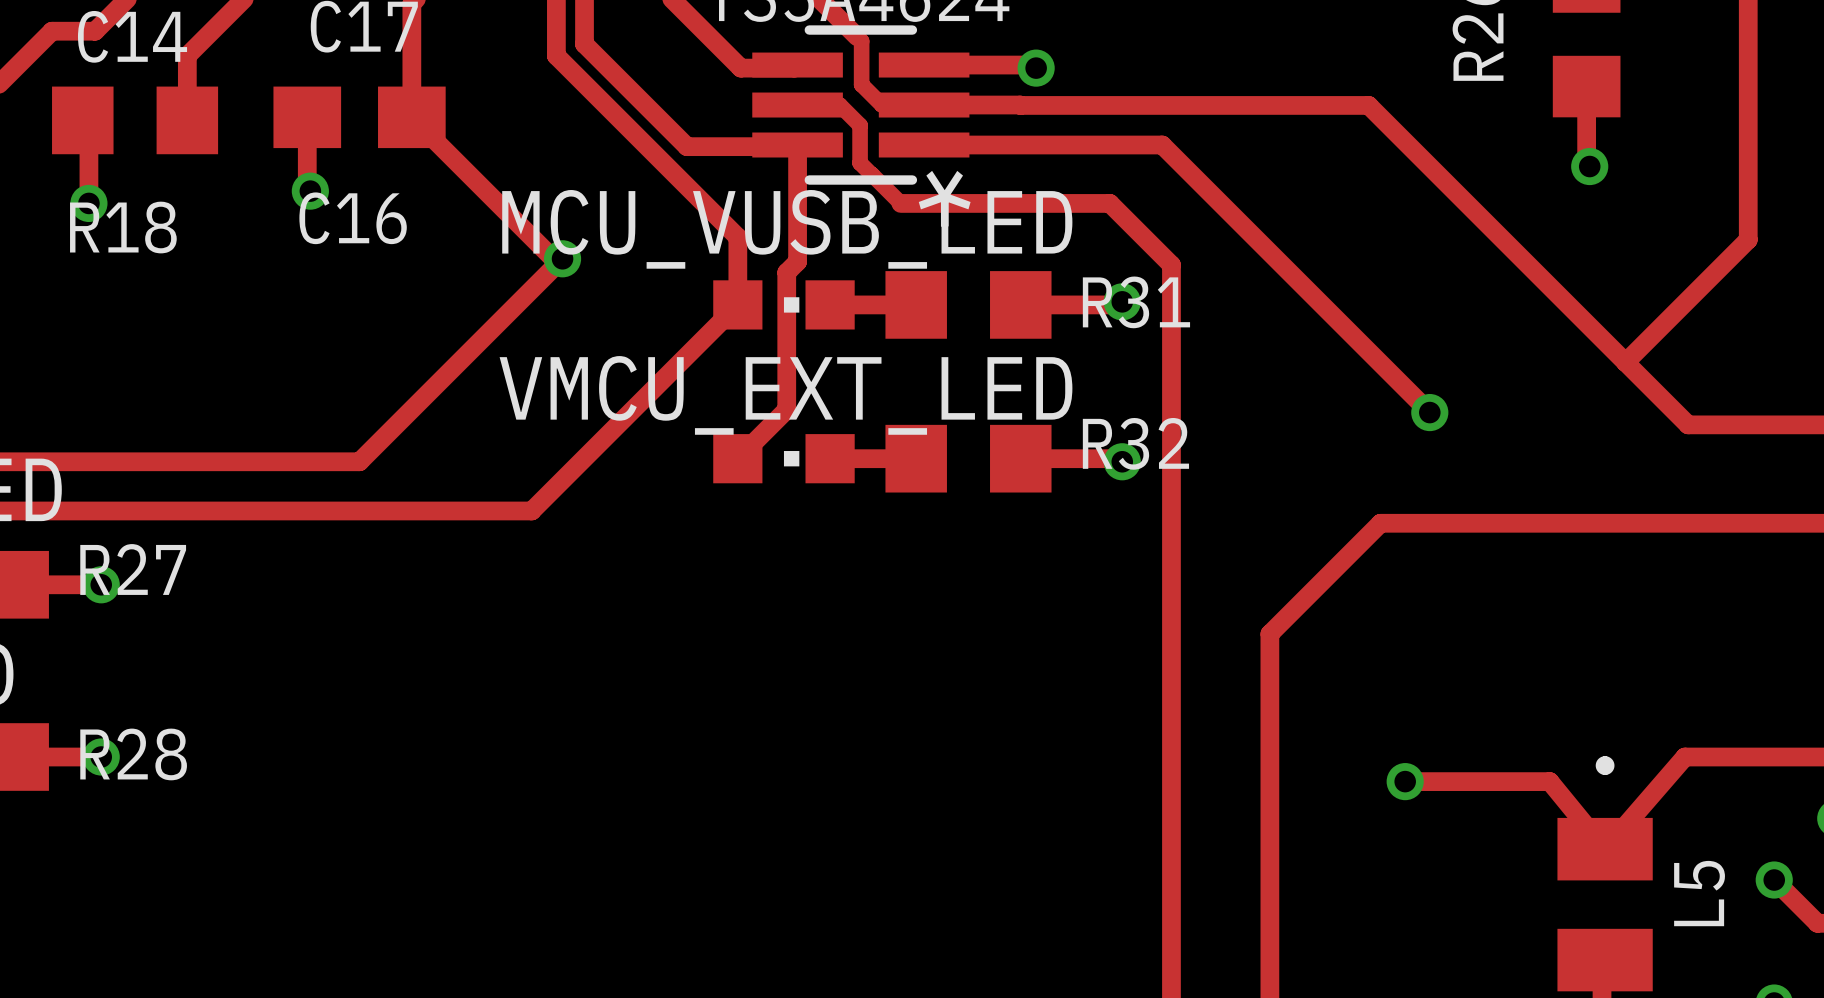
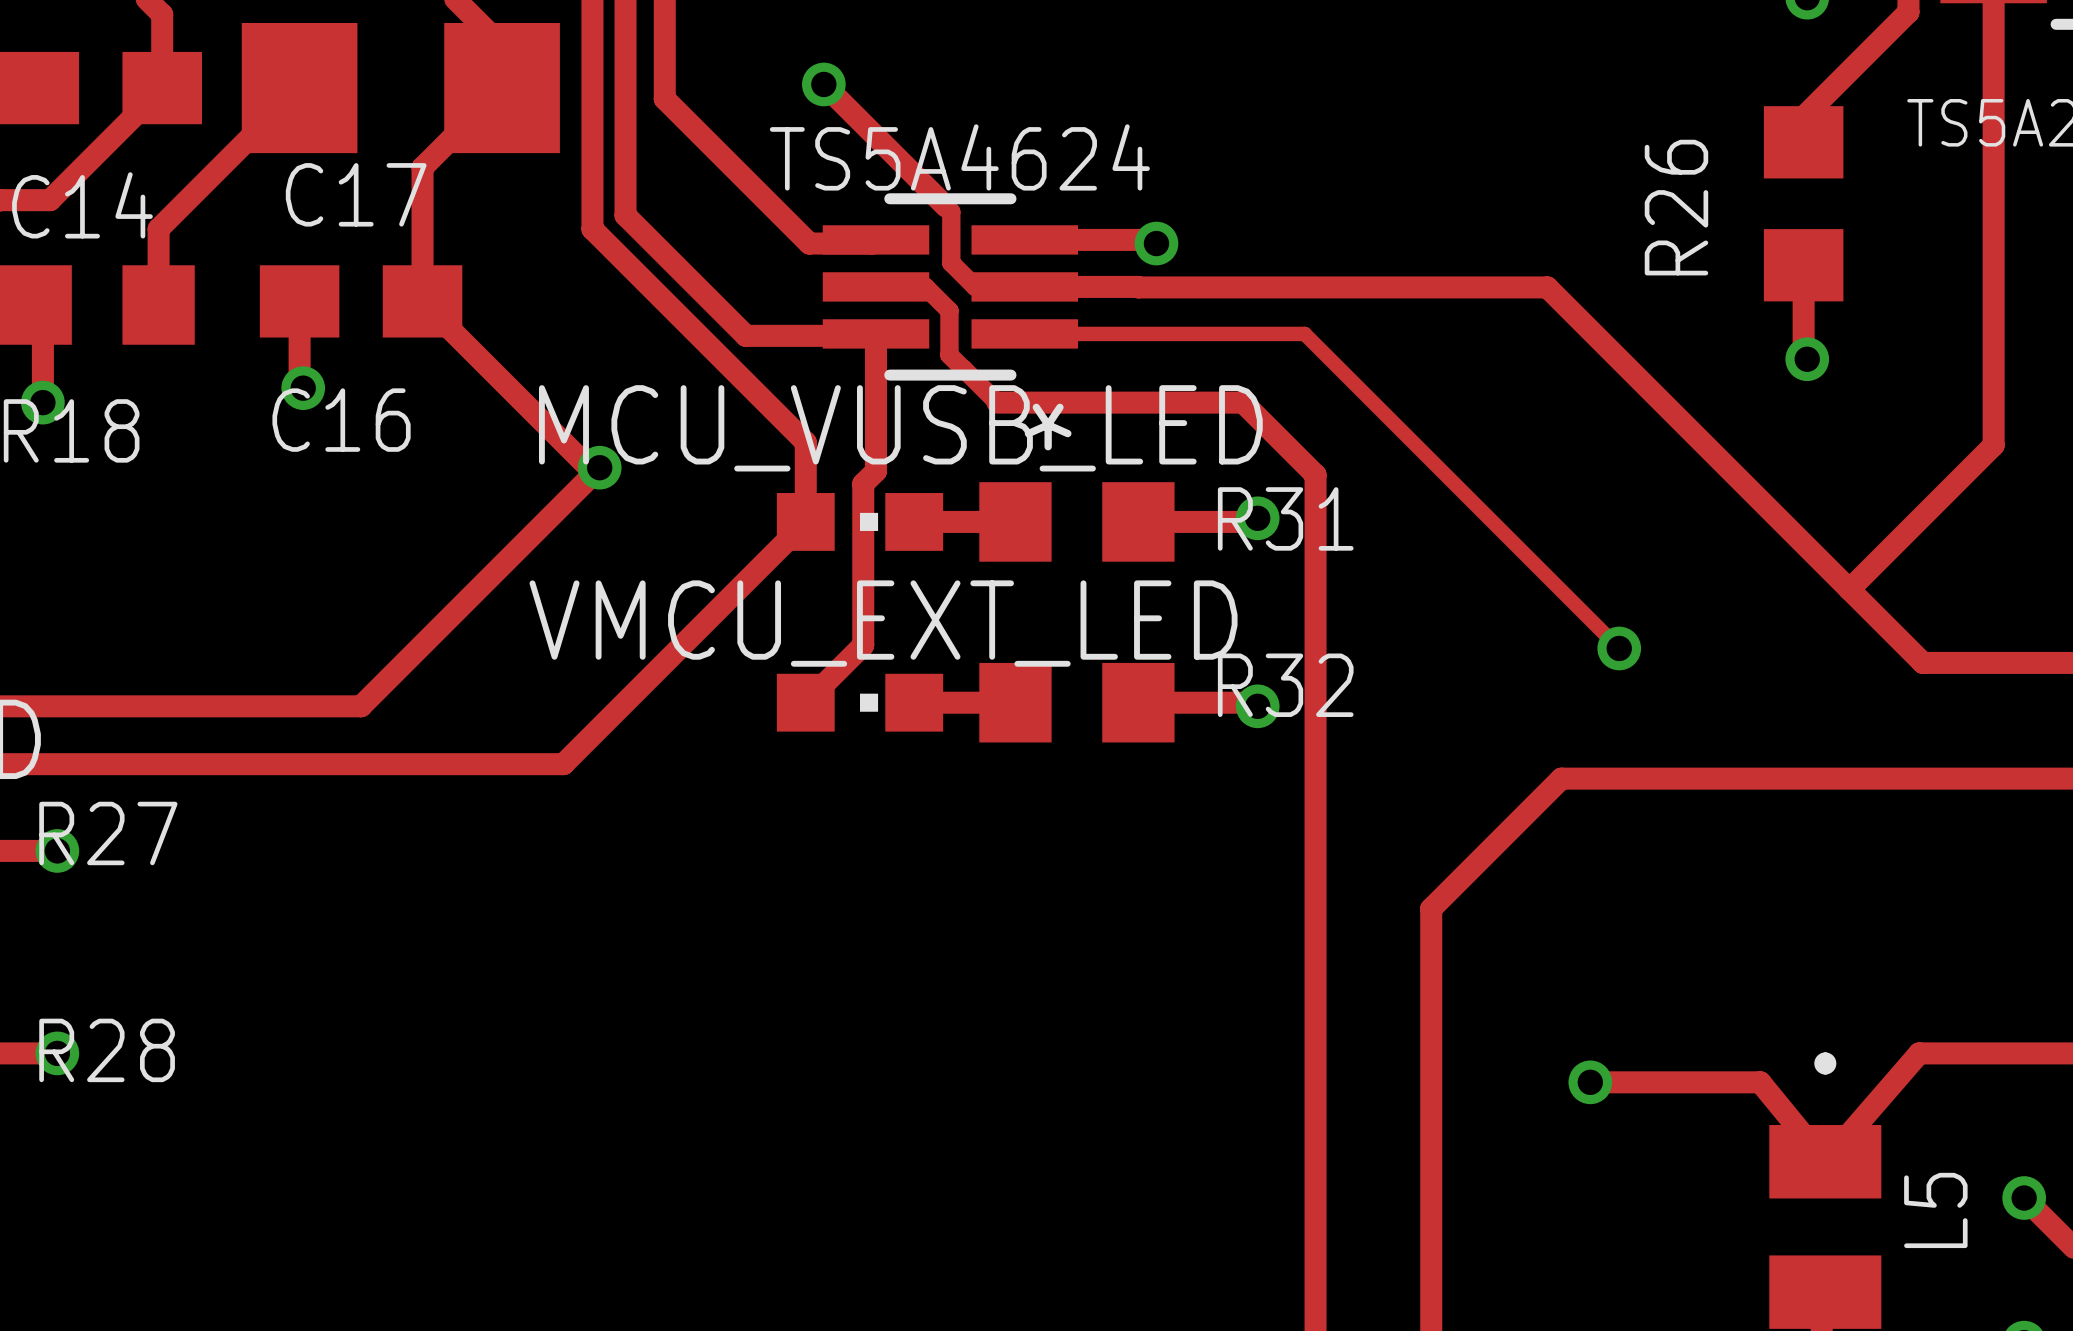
track width: thick (924, 145) (1162, 145) (1429, 412) -> thin (1024, 333) (1304, 333) (1619, 648)

